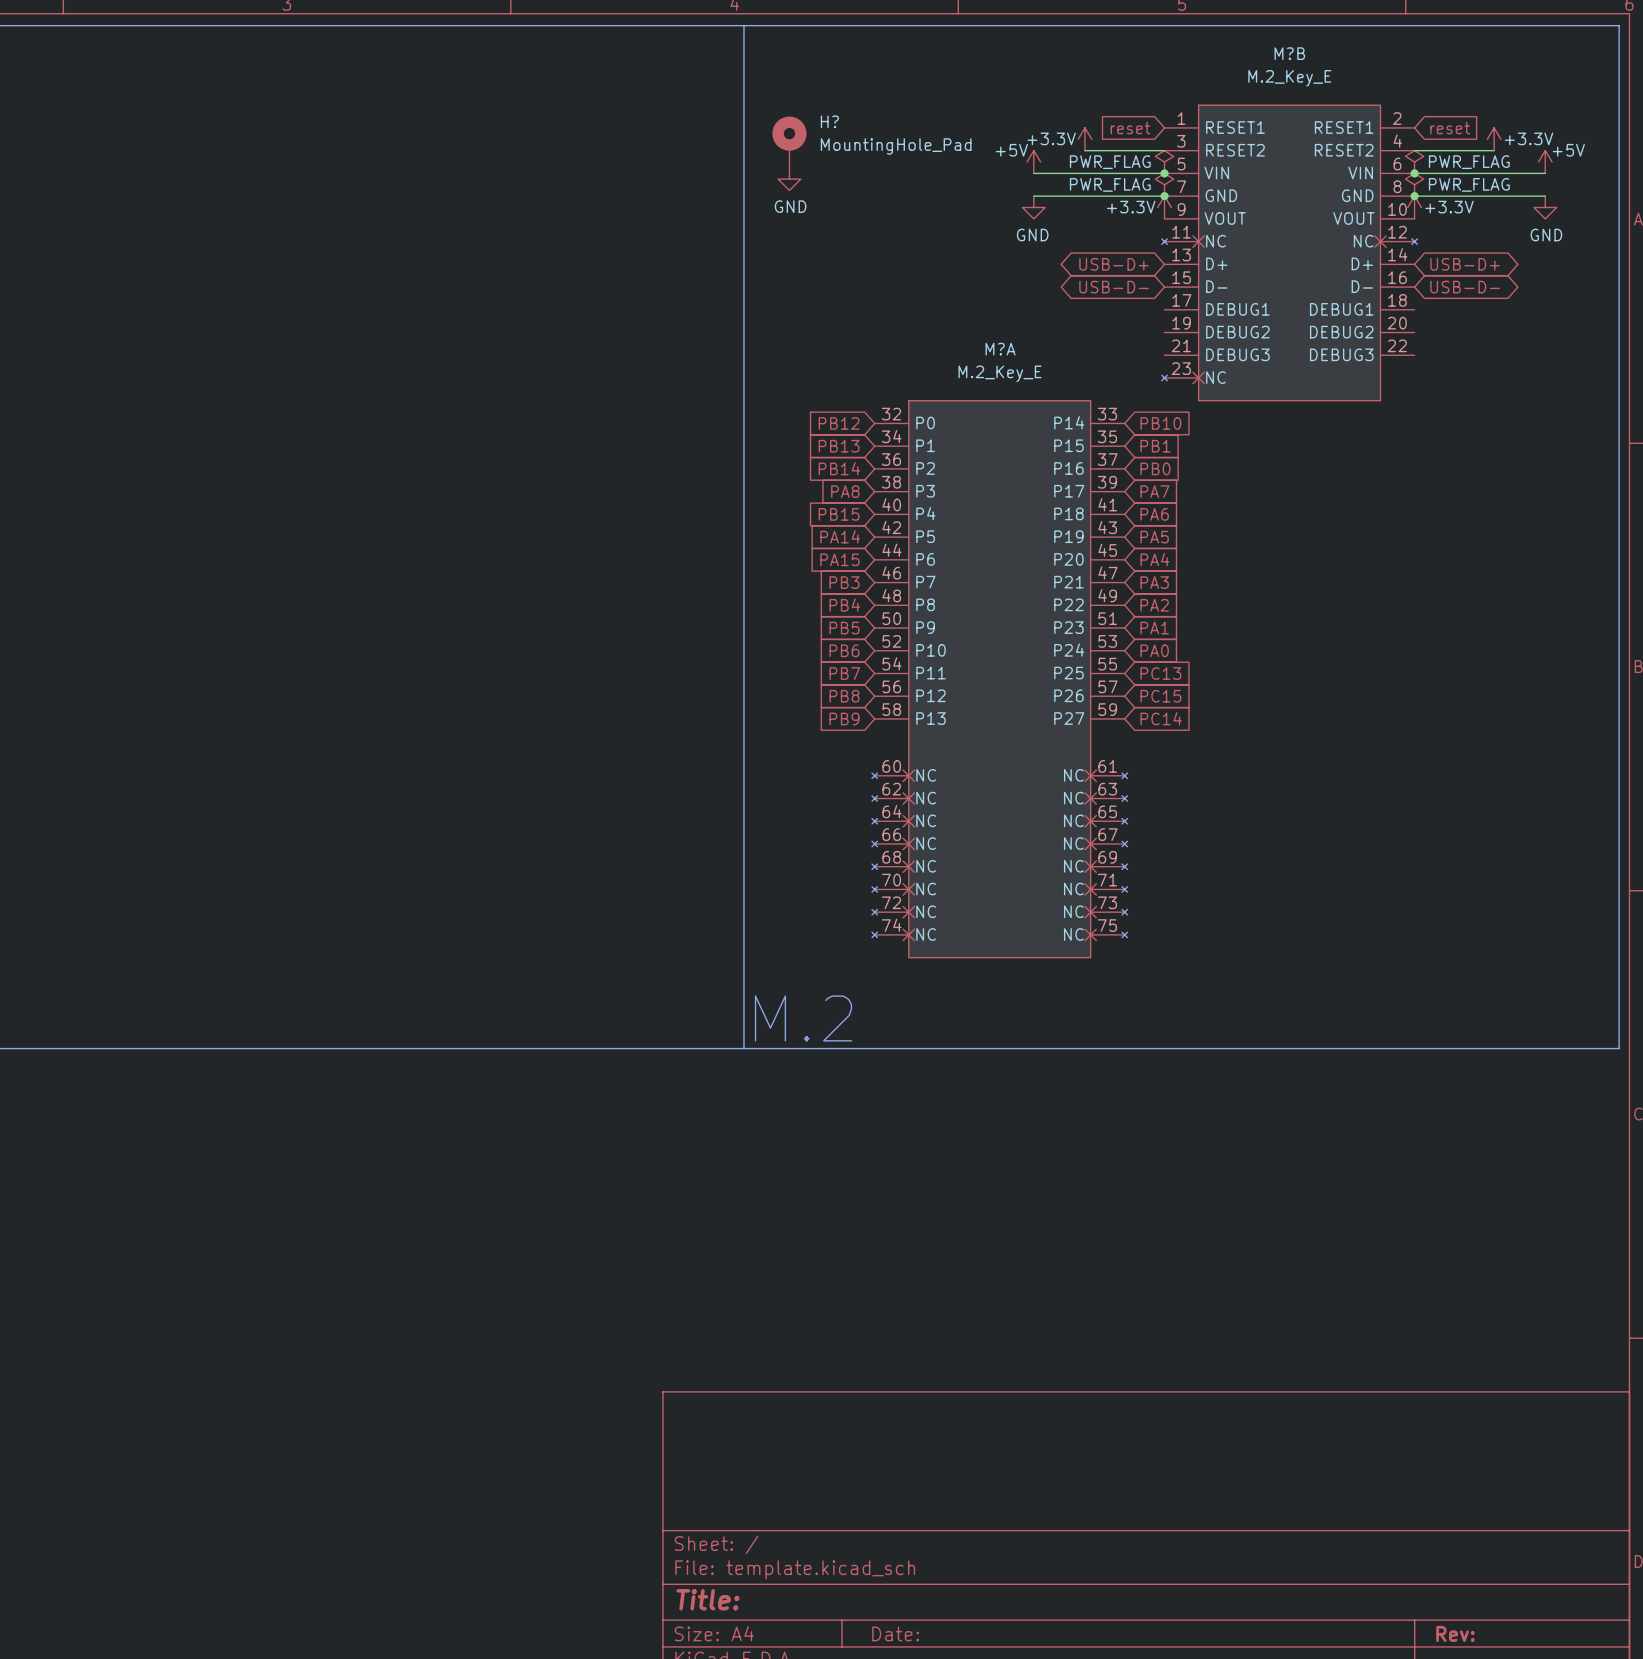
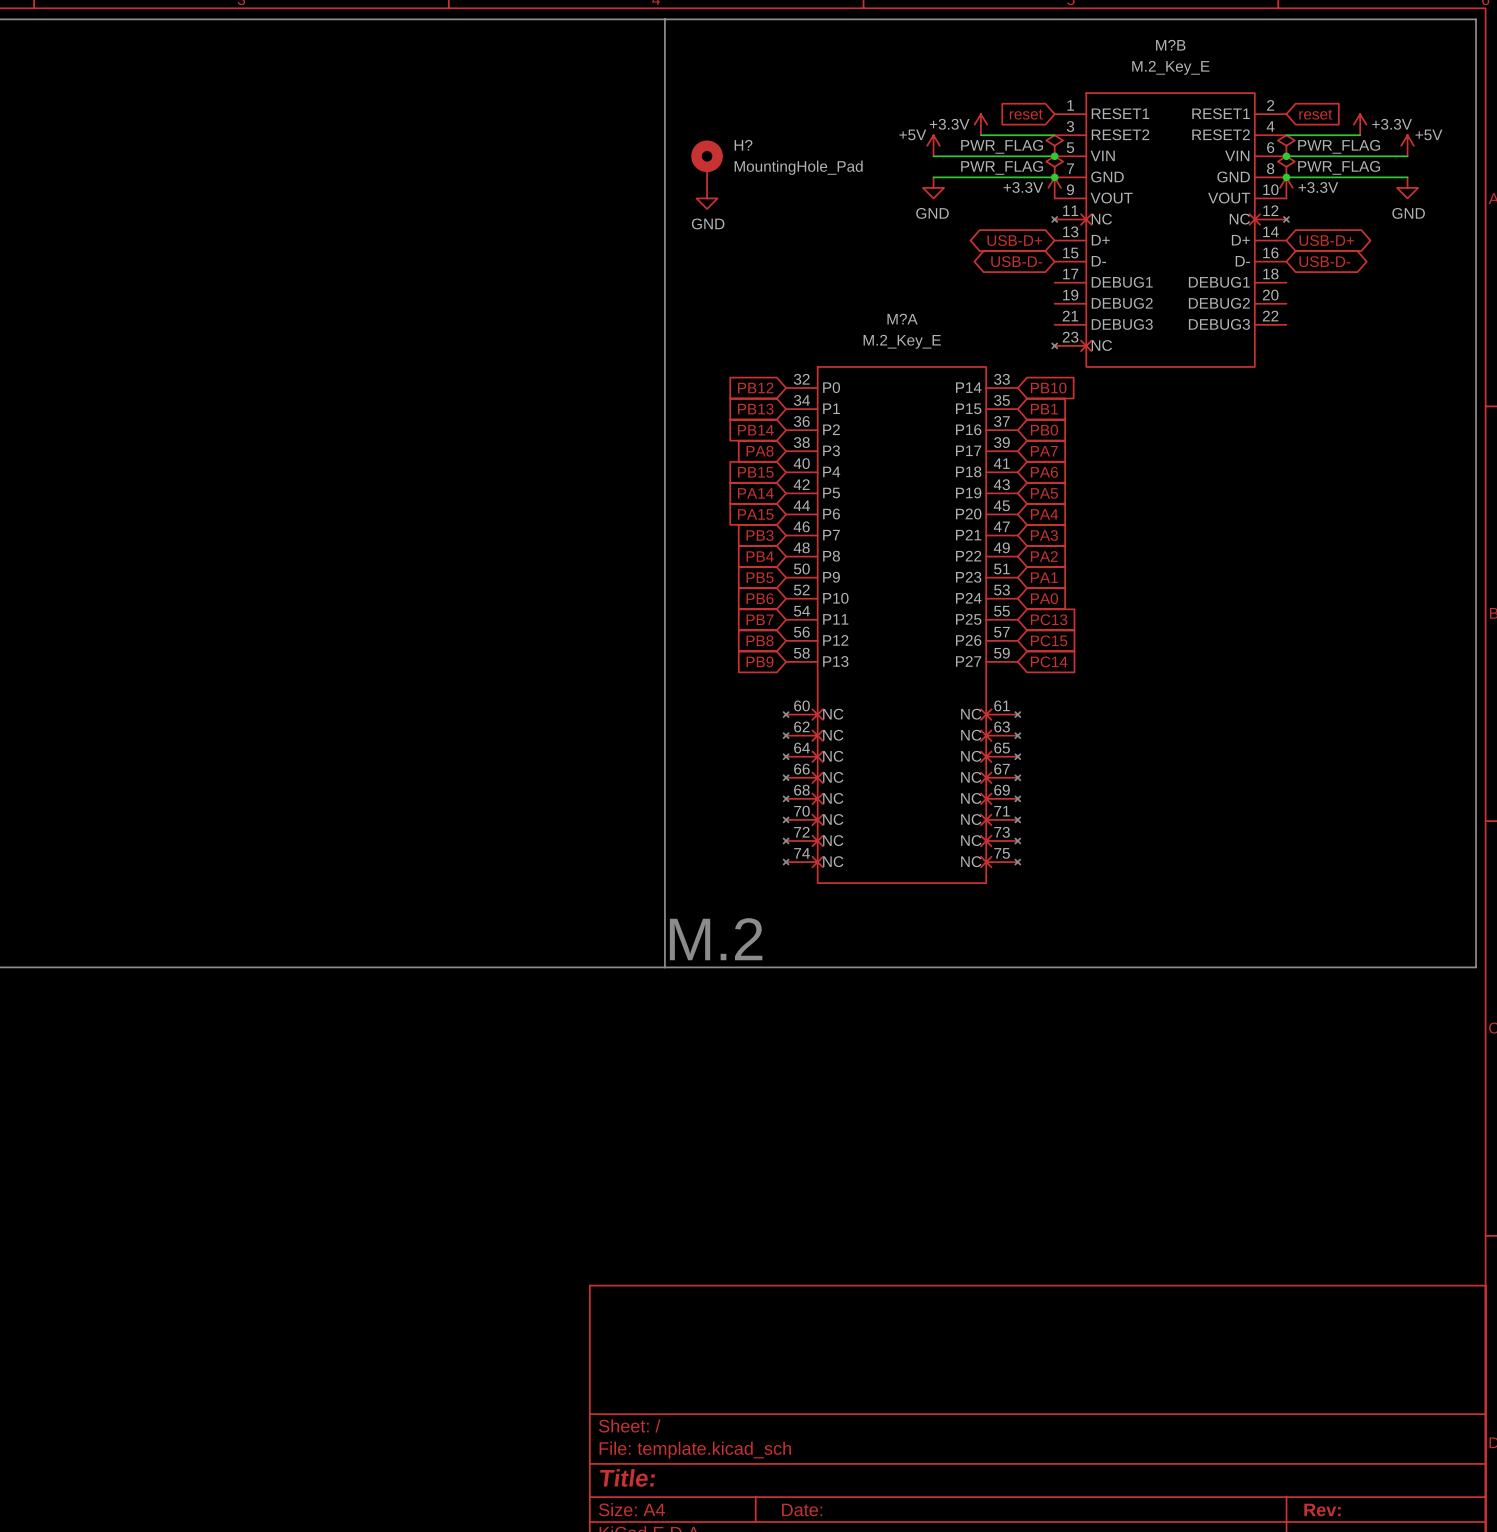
H? position: (789, 142) -> (707, 164)
power symbol position: GND (789, 179) -> GND (707, 198)

